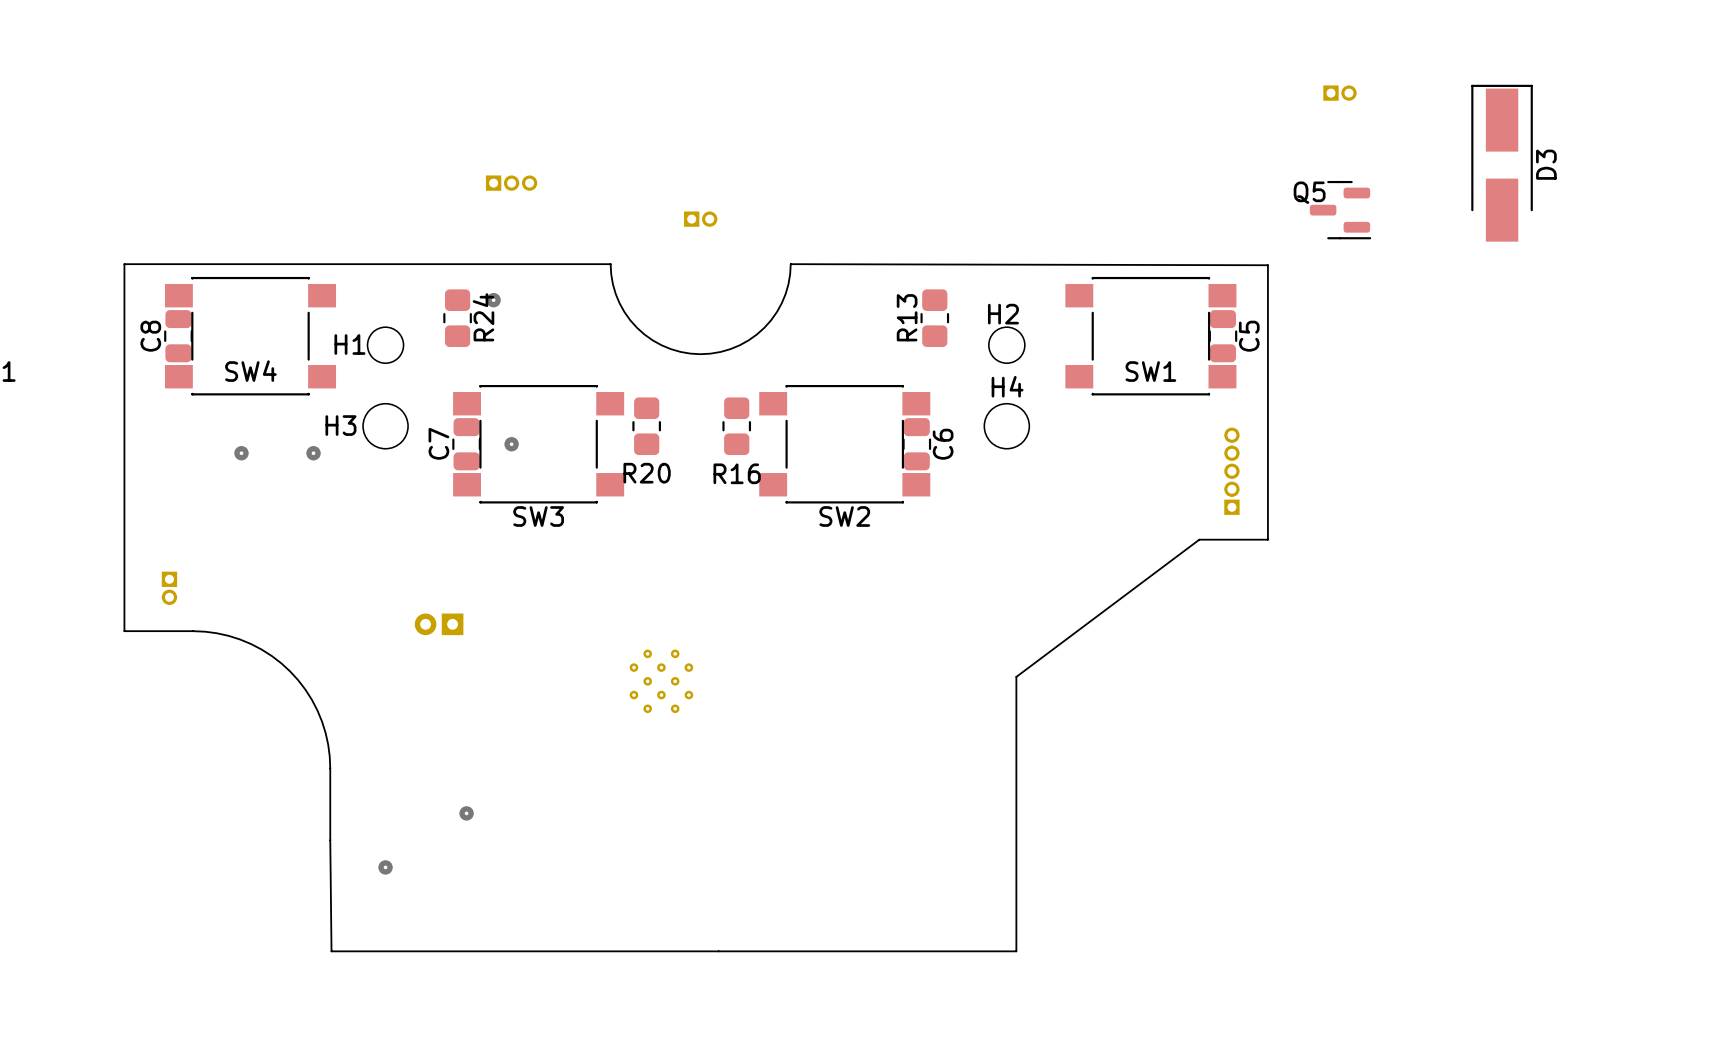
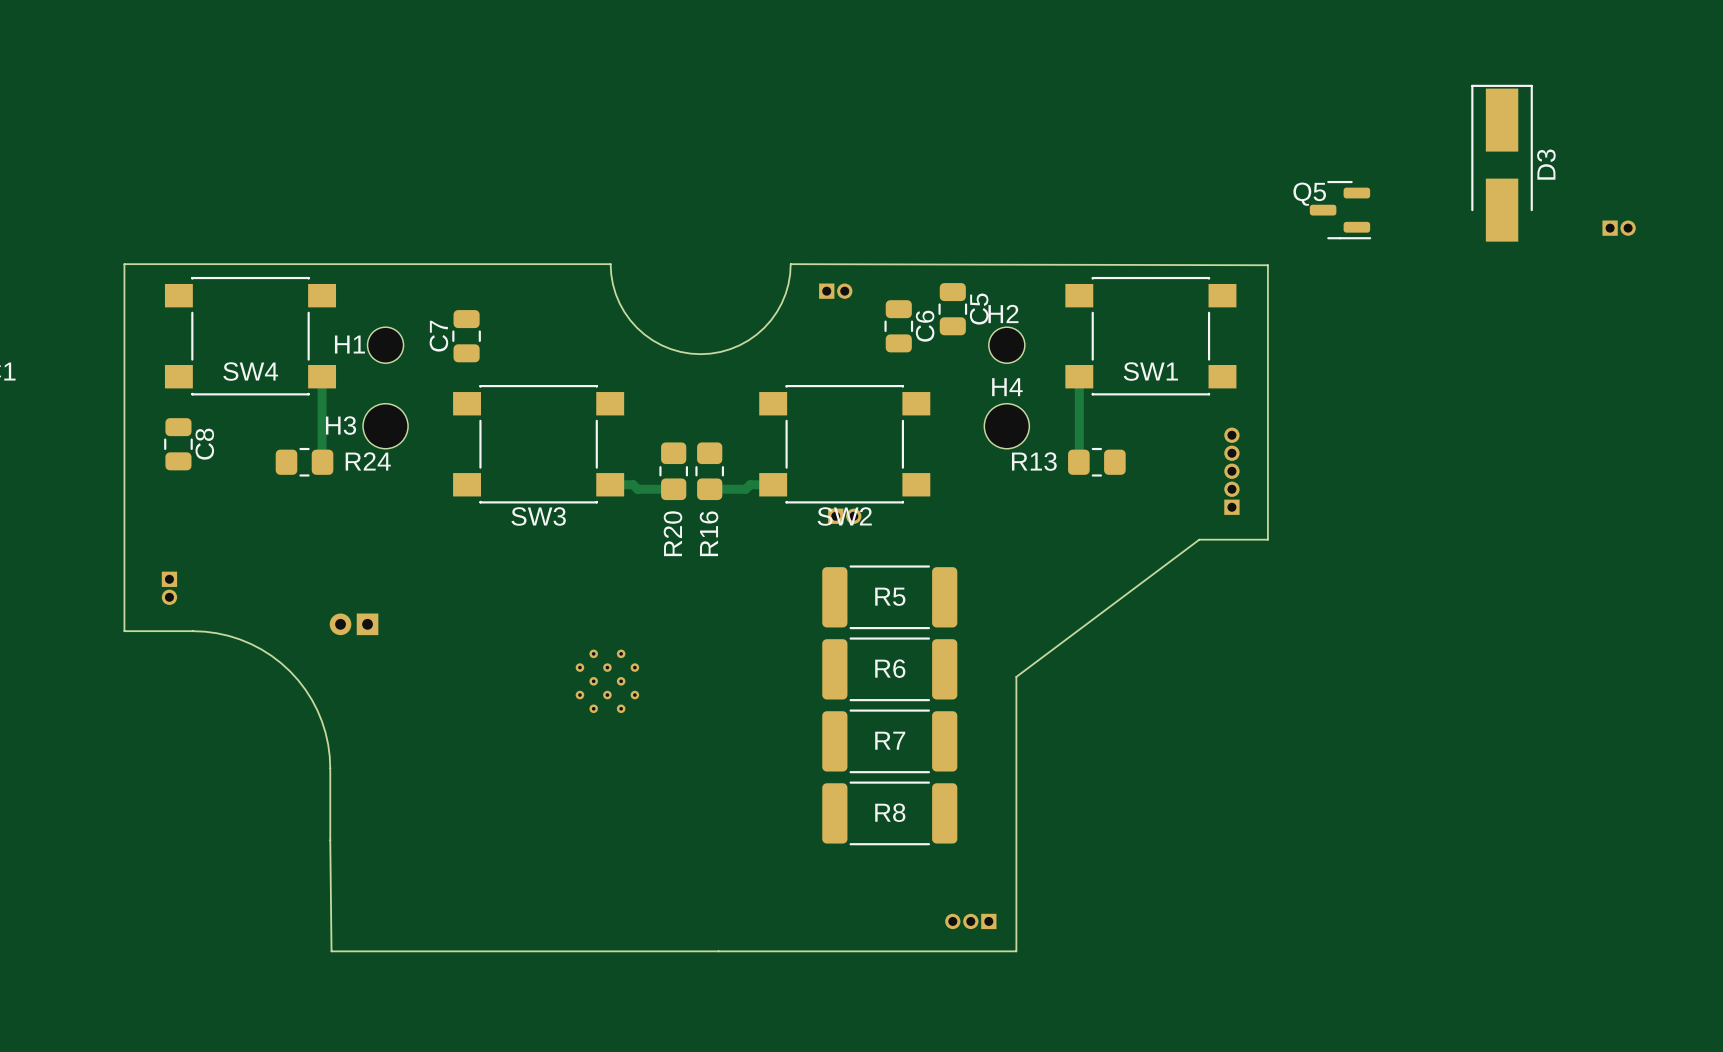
part: (1339, 93) -> none
part: (511, 183) -> none
part position: (700, 219) -> (835, 291)
part: none -> (1619, 228)
via: (493, 300) -> none
R13 name position: R13 (907, 317) -> R13 (1034, 461)
R24 rotation: 0° (457, 318) -> 90° clockwise (304, 462)
R24 position: (457, 318) -> (304, 462)
R13 rotation: 0° (934, 318) -> 90° clockwise (1096, 462)
R13 position: (934, 318) -> (1096, 462)
C8 name position: C8 (150, 336) -> C8 (204, 444)
C8 position: (178, 336) -> (178, 444)
C5 position: (1222, 336) -> (952, 309)
track: none -> (322, 376) (322, 462)
track: none -> (1079, 376) (1078, 462)
R20 position: (646, 426) -> (673, 471)
R16 position: (736, 426) -> (709, 471)
C7 position: (466, 444) -> (466, 336)
via: (511, 444) -> none
C6 position: (916, 444) -> (898, 326)
via: (241, 453) -> none
via: (313, 453) -> none
R20 name rotation: 0° (647, 473) -> 90° counterclockwise (673, 533)
R16 name rotation: 0° (737, 473) -> 90° counterclockwise (709, 533)
track: none -> (610, 484) (633, 484) (637, 489) (673, 489)
track: none -> (773, 484) (750, 484) (745, 489) (709, 489)
part: none -> (844, 516)
R5: none -> (889, 597)
part position: (439, 624) -> (354, 624)
R6: none -> (889, 669)
part position: (661, 681) -> (607, 681)
R7: none -> (889, 741)
via: (466, 813) -> none
R8: none -> (889, 813)
via: (385, 867) -> none
part: none -> (970, 921)

